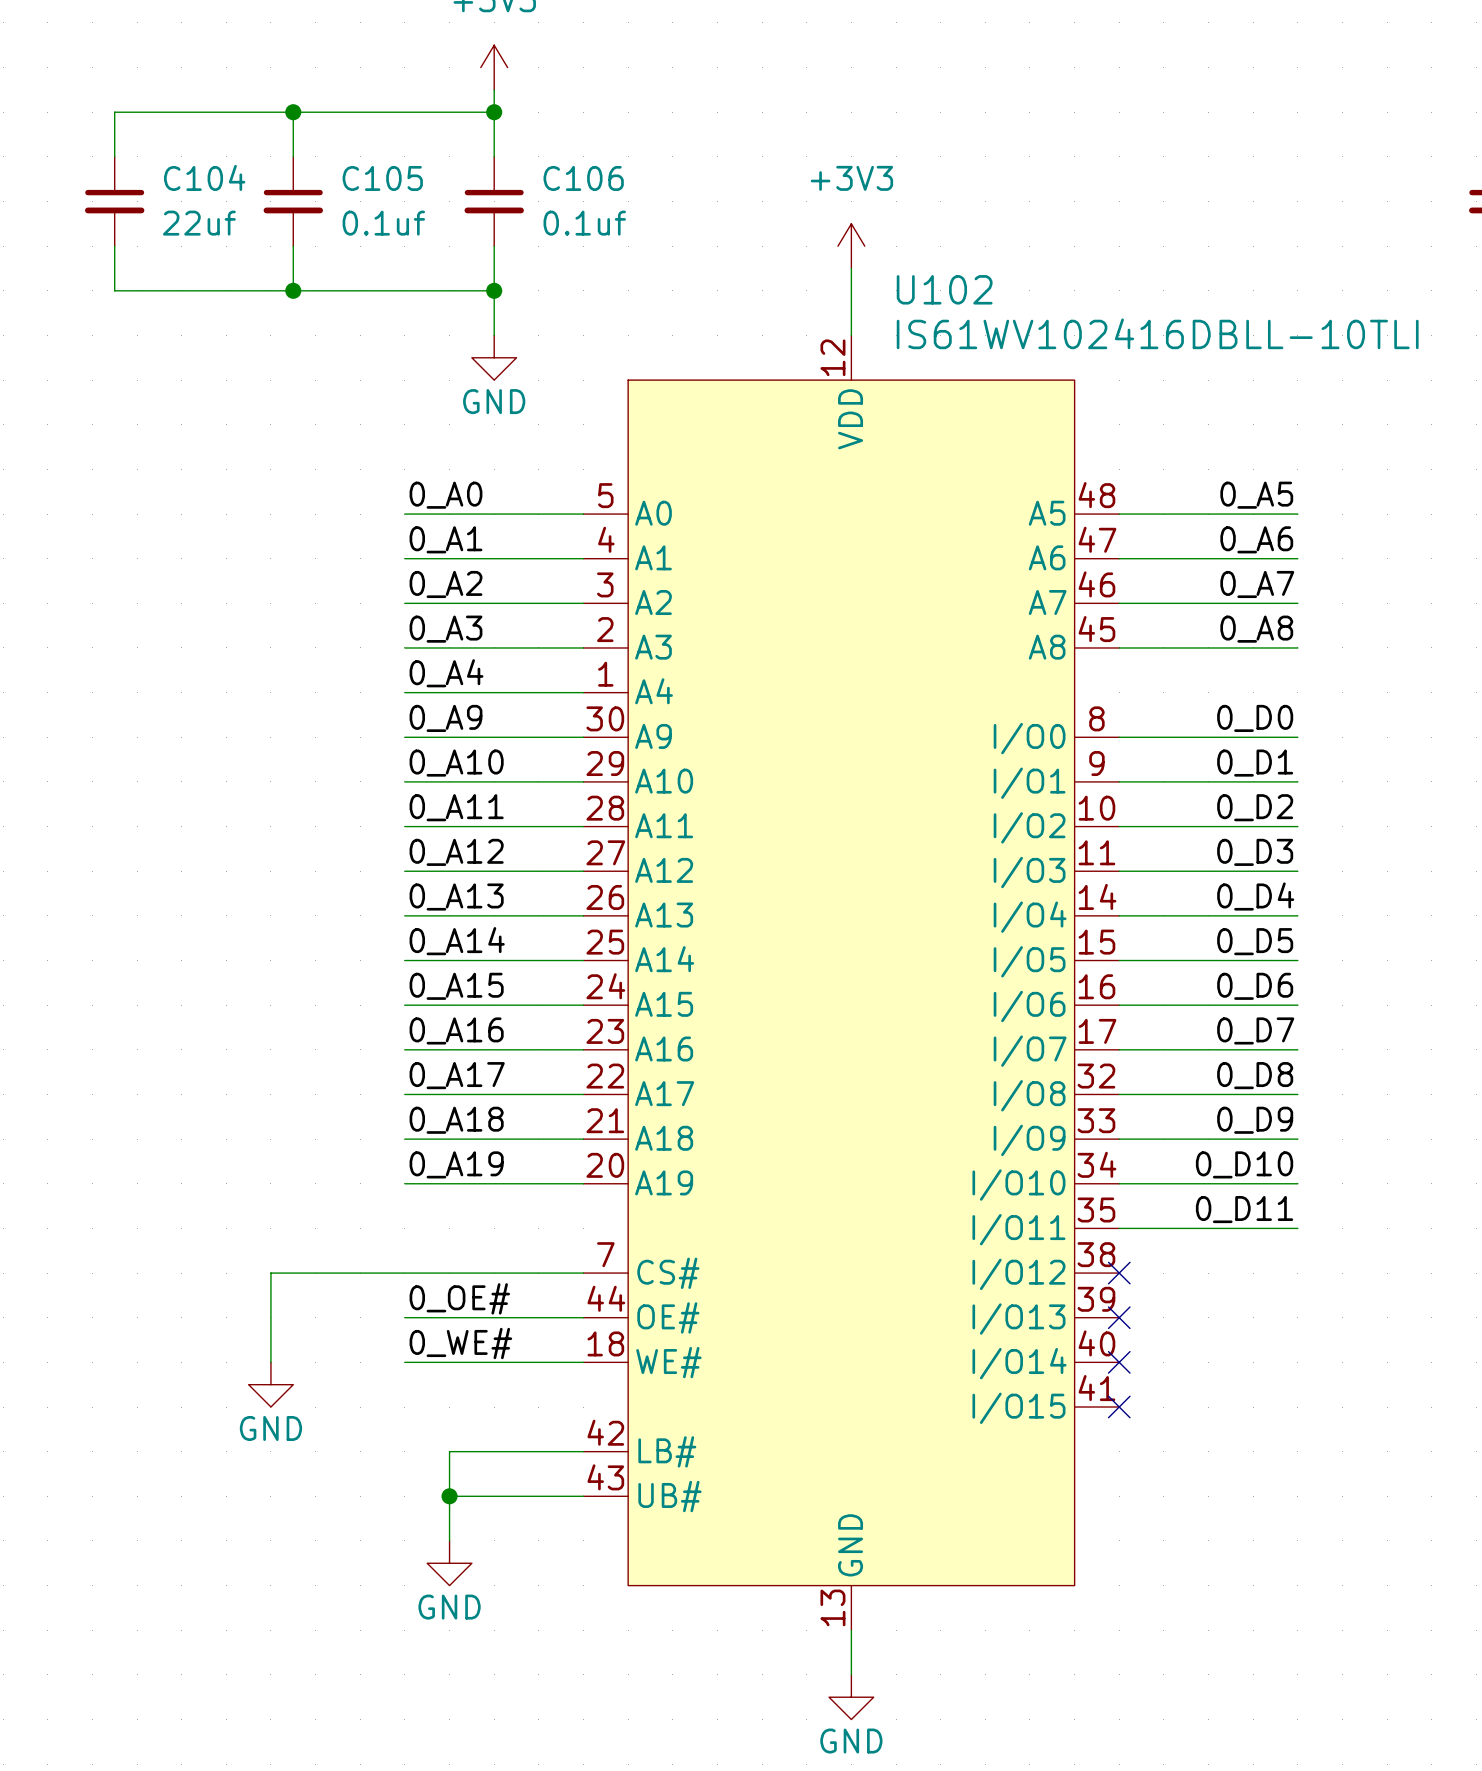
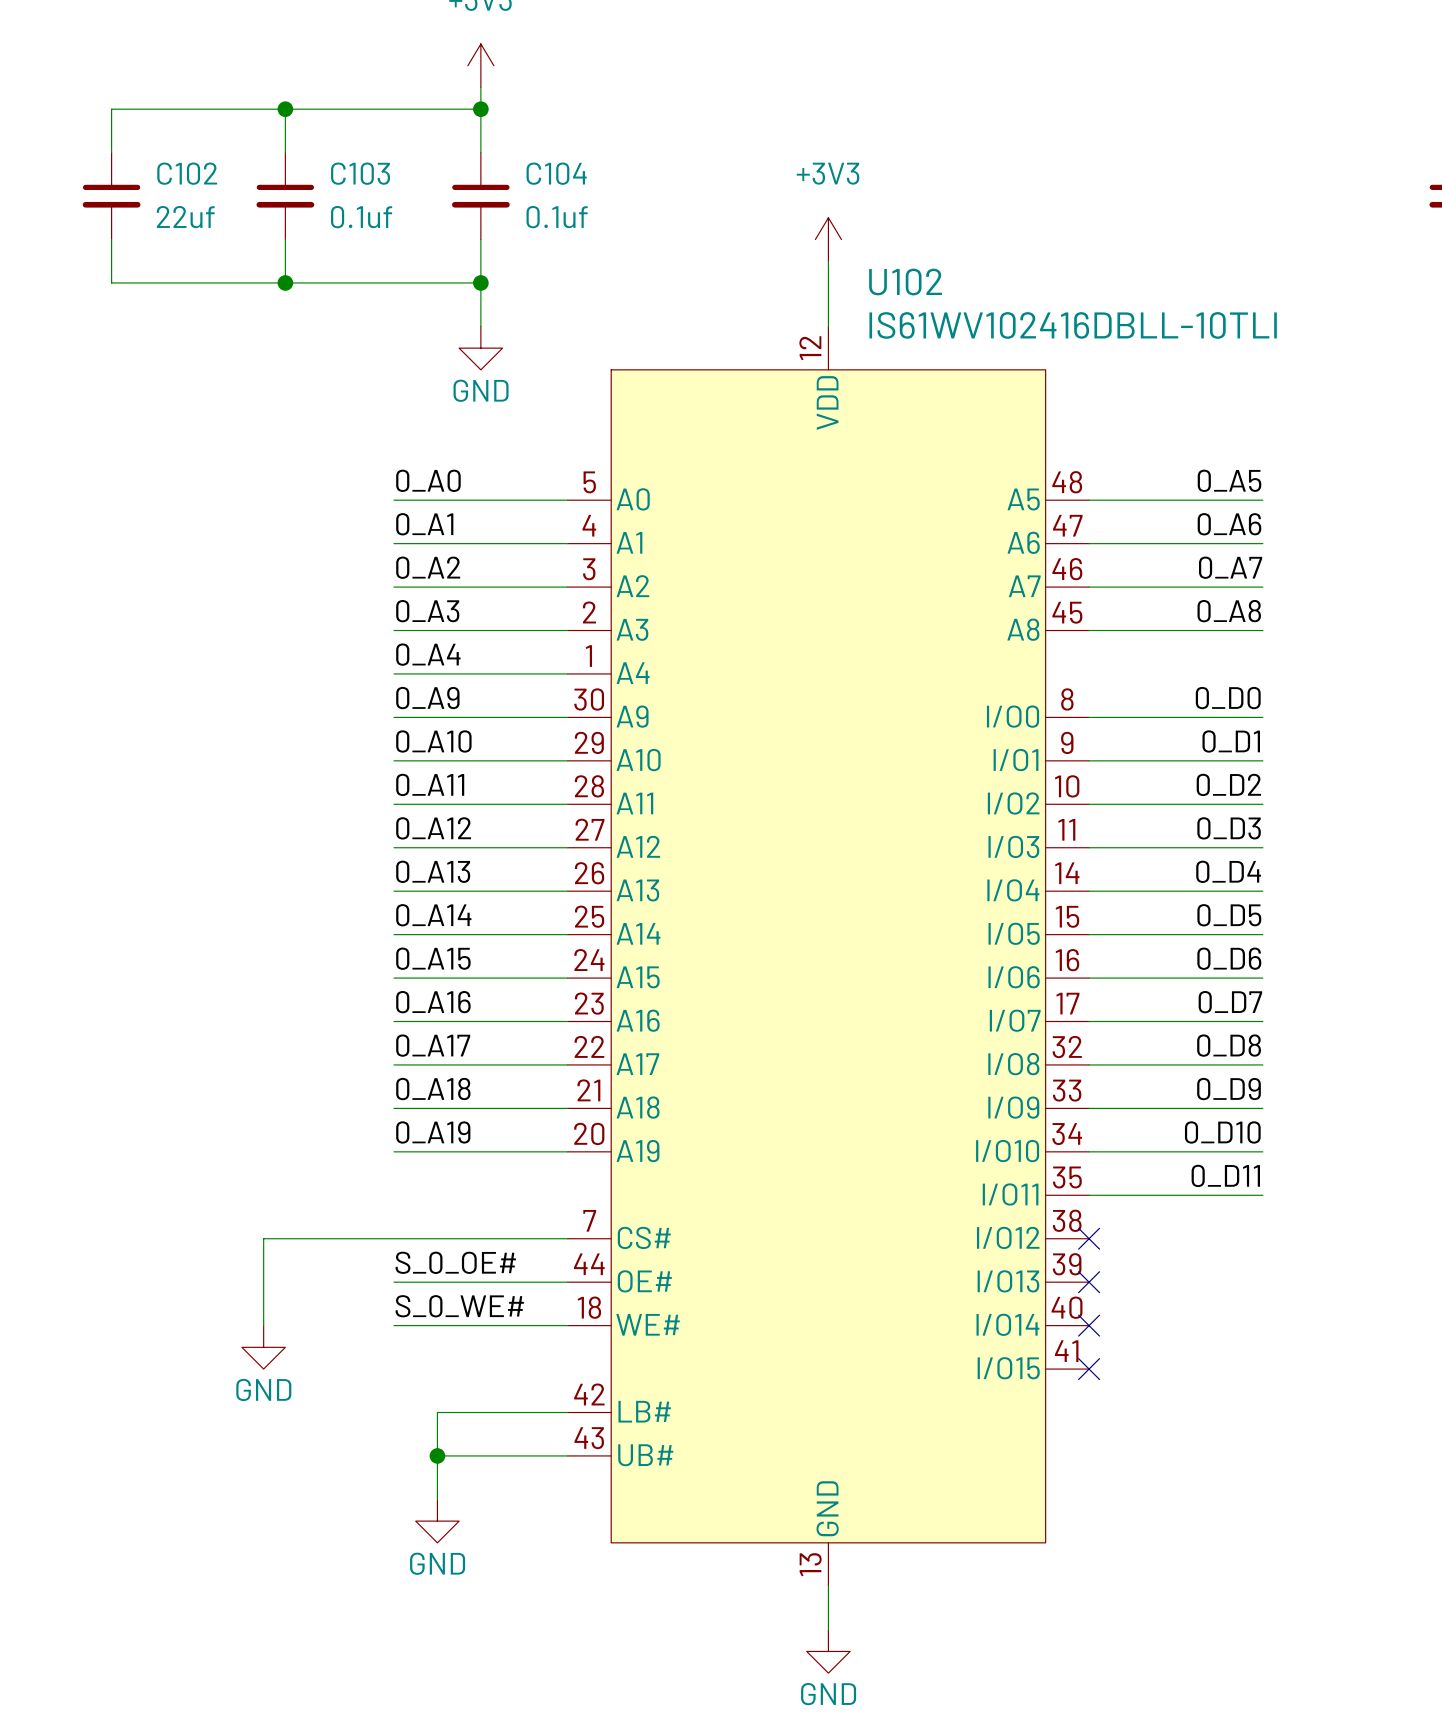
C104 name: C104 (204, 177) -> C102 (187, 173)
C105 name: C105 (382, 178) -> C103 (360, 173)
C106 name: C106 (583, 178) -> C104 (556, 173)
label: 0_OE# (459, 1298) -> S_0_OE# (455, 1262)
label: 0_WE# (460, 1343) -> S_0_WE# (459, 1306)

